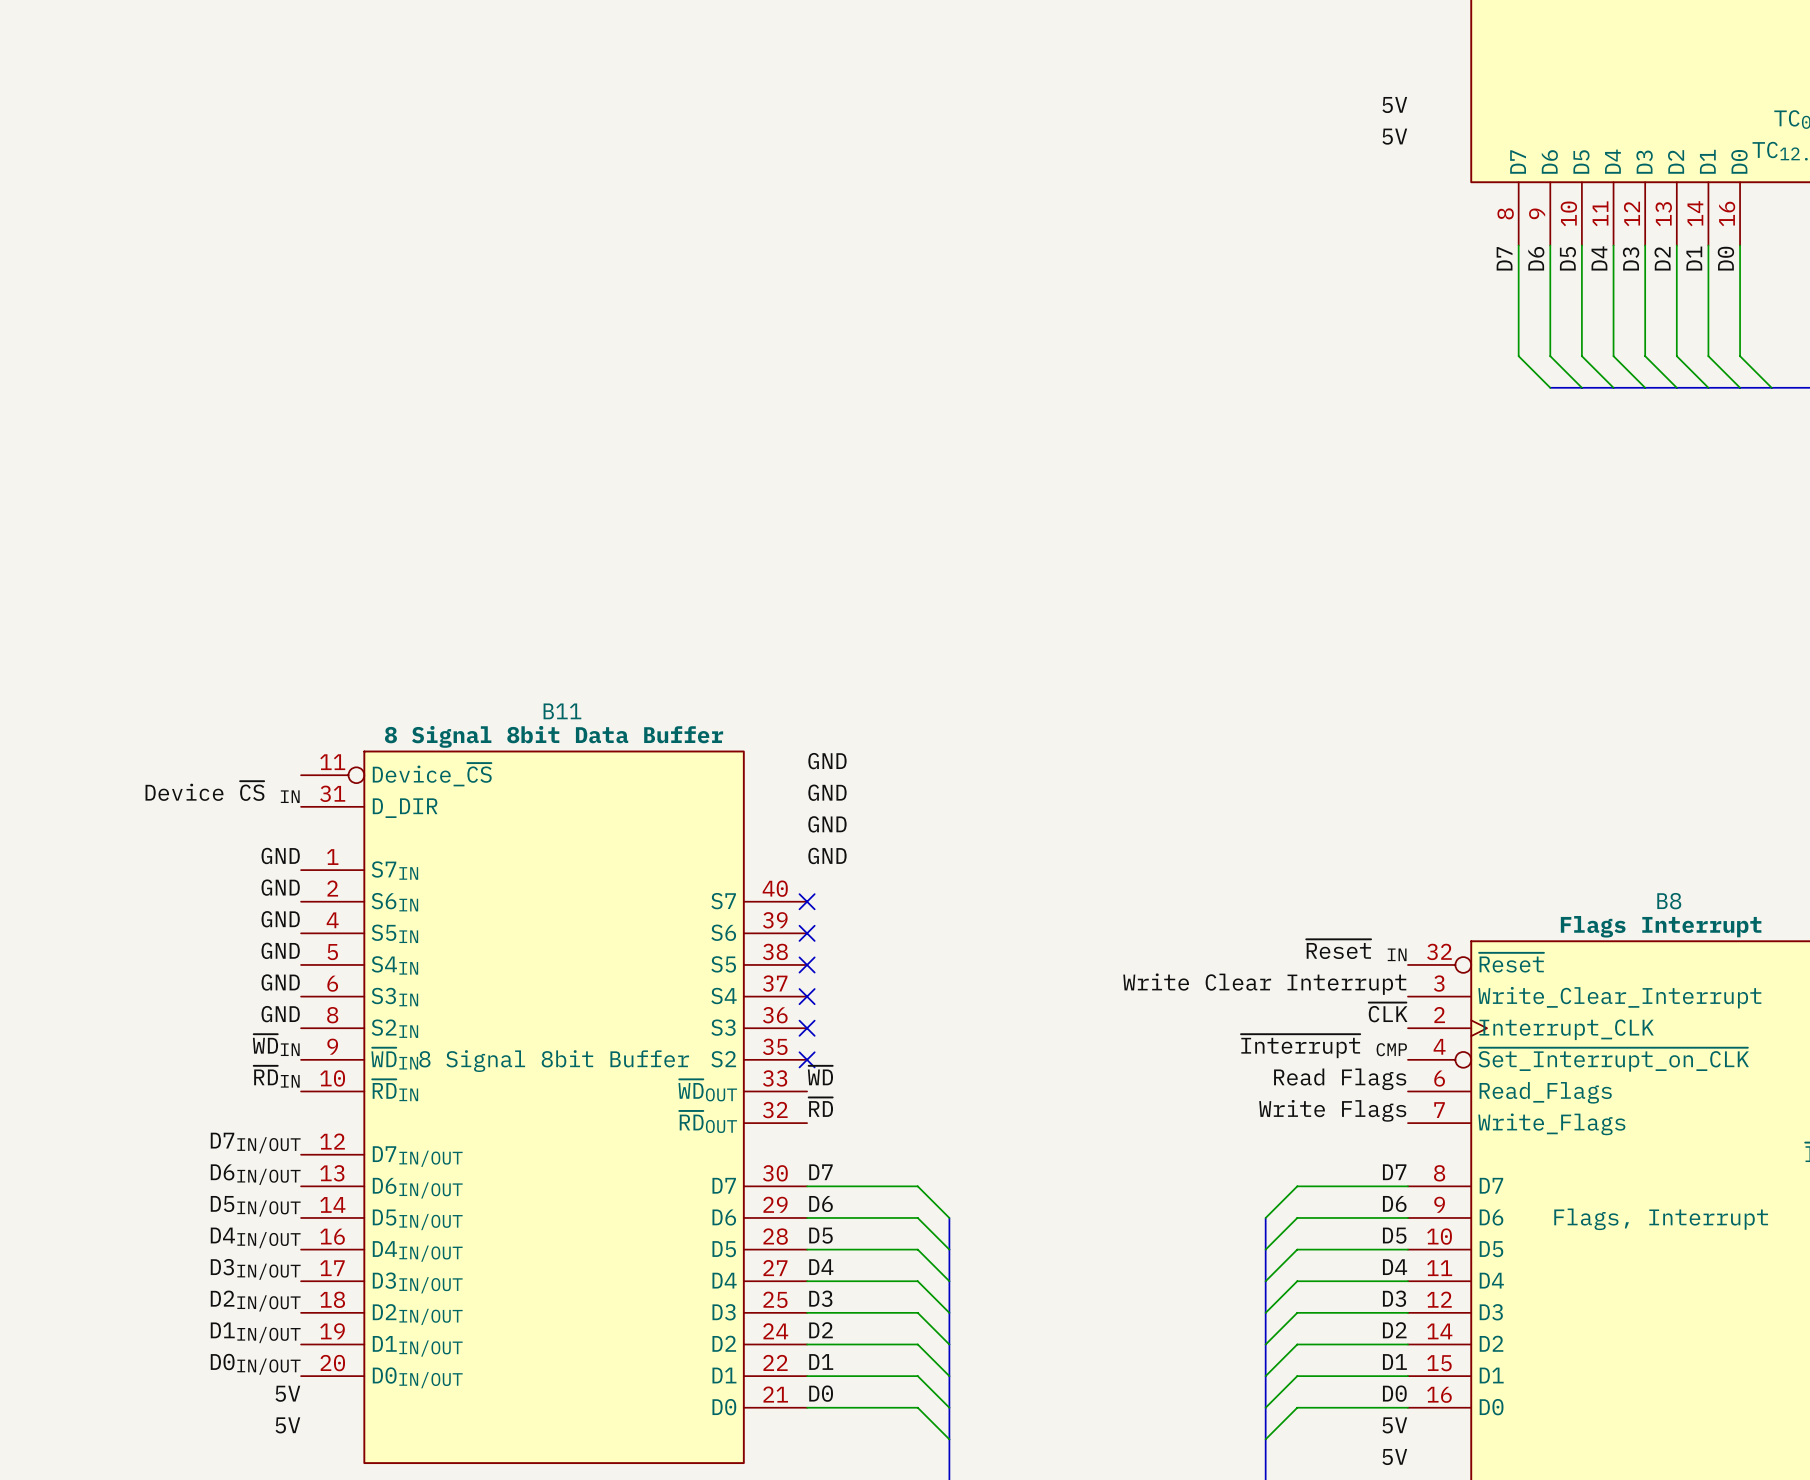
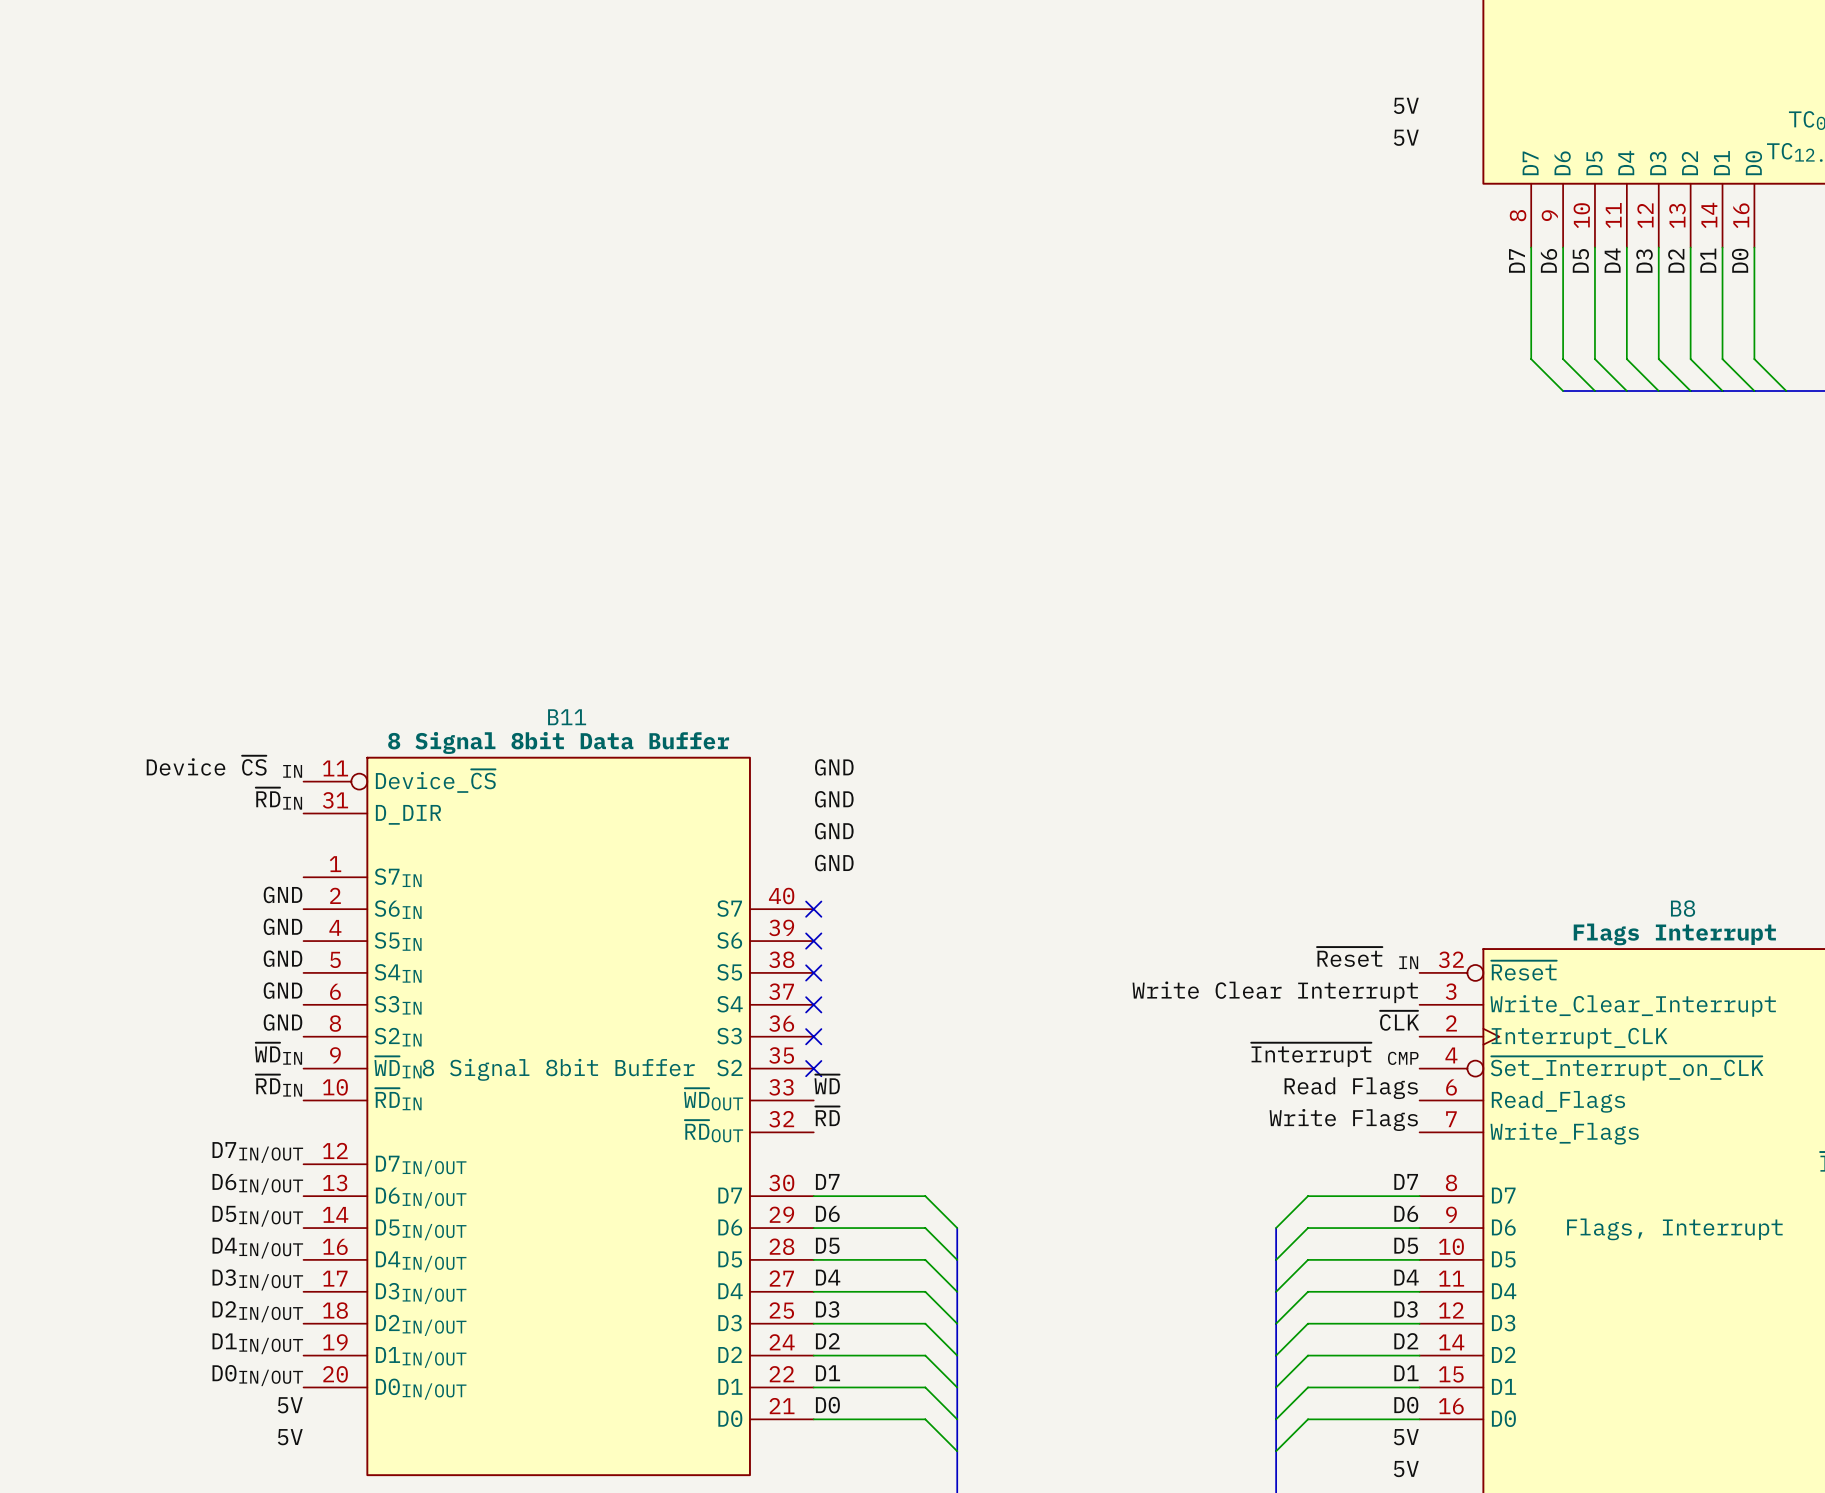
label: none -> Device ~{CS} IN (224, 766)
label: Device ~{CS} IN (222, 792) -> ~{RD}IN (278, 798)
label: GND (280, 855) -> none

